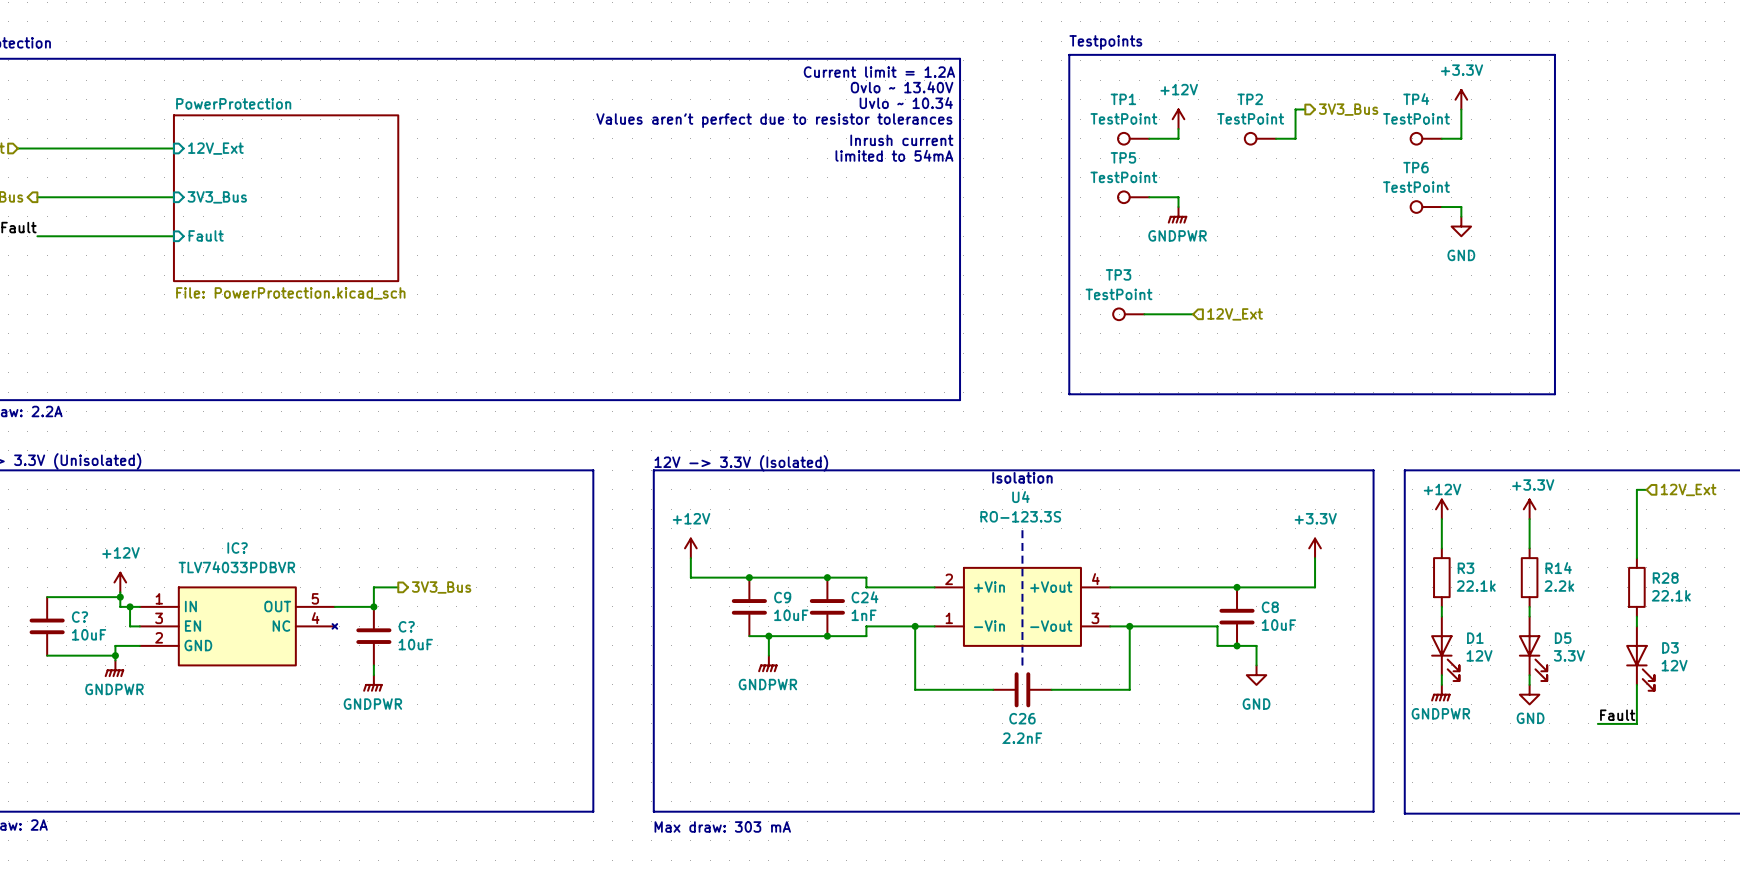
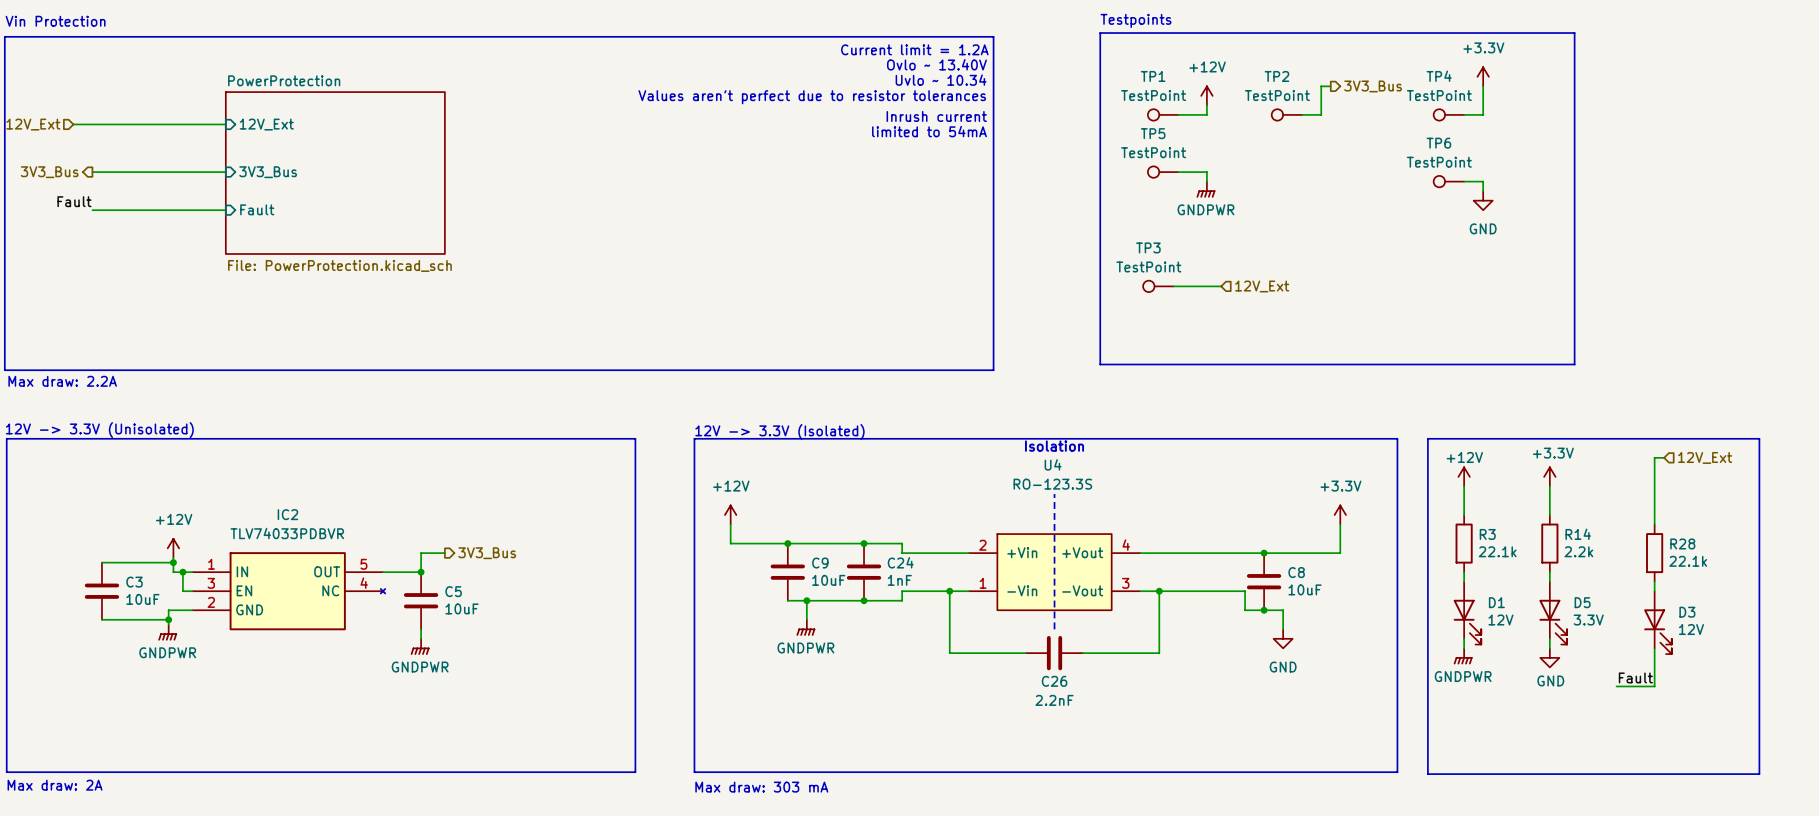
IC? name: IC? (237, 548) -> IC2 (287, 514)
C? name: C? (80, 617) -> C3 (134, 582)
C? name: C? (406, 626) -> C5 (453, 591)

